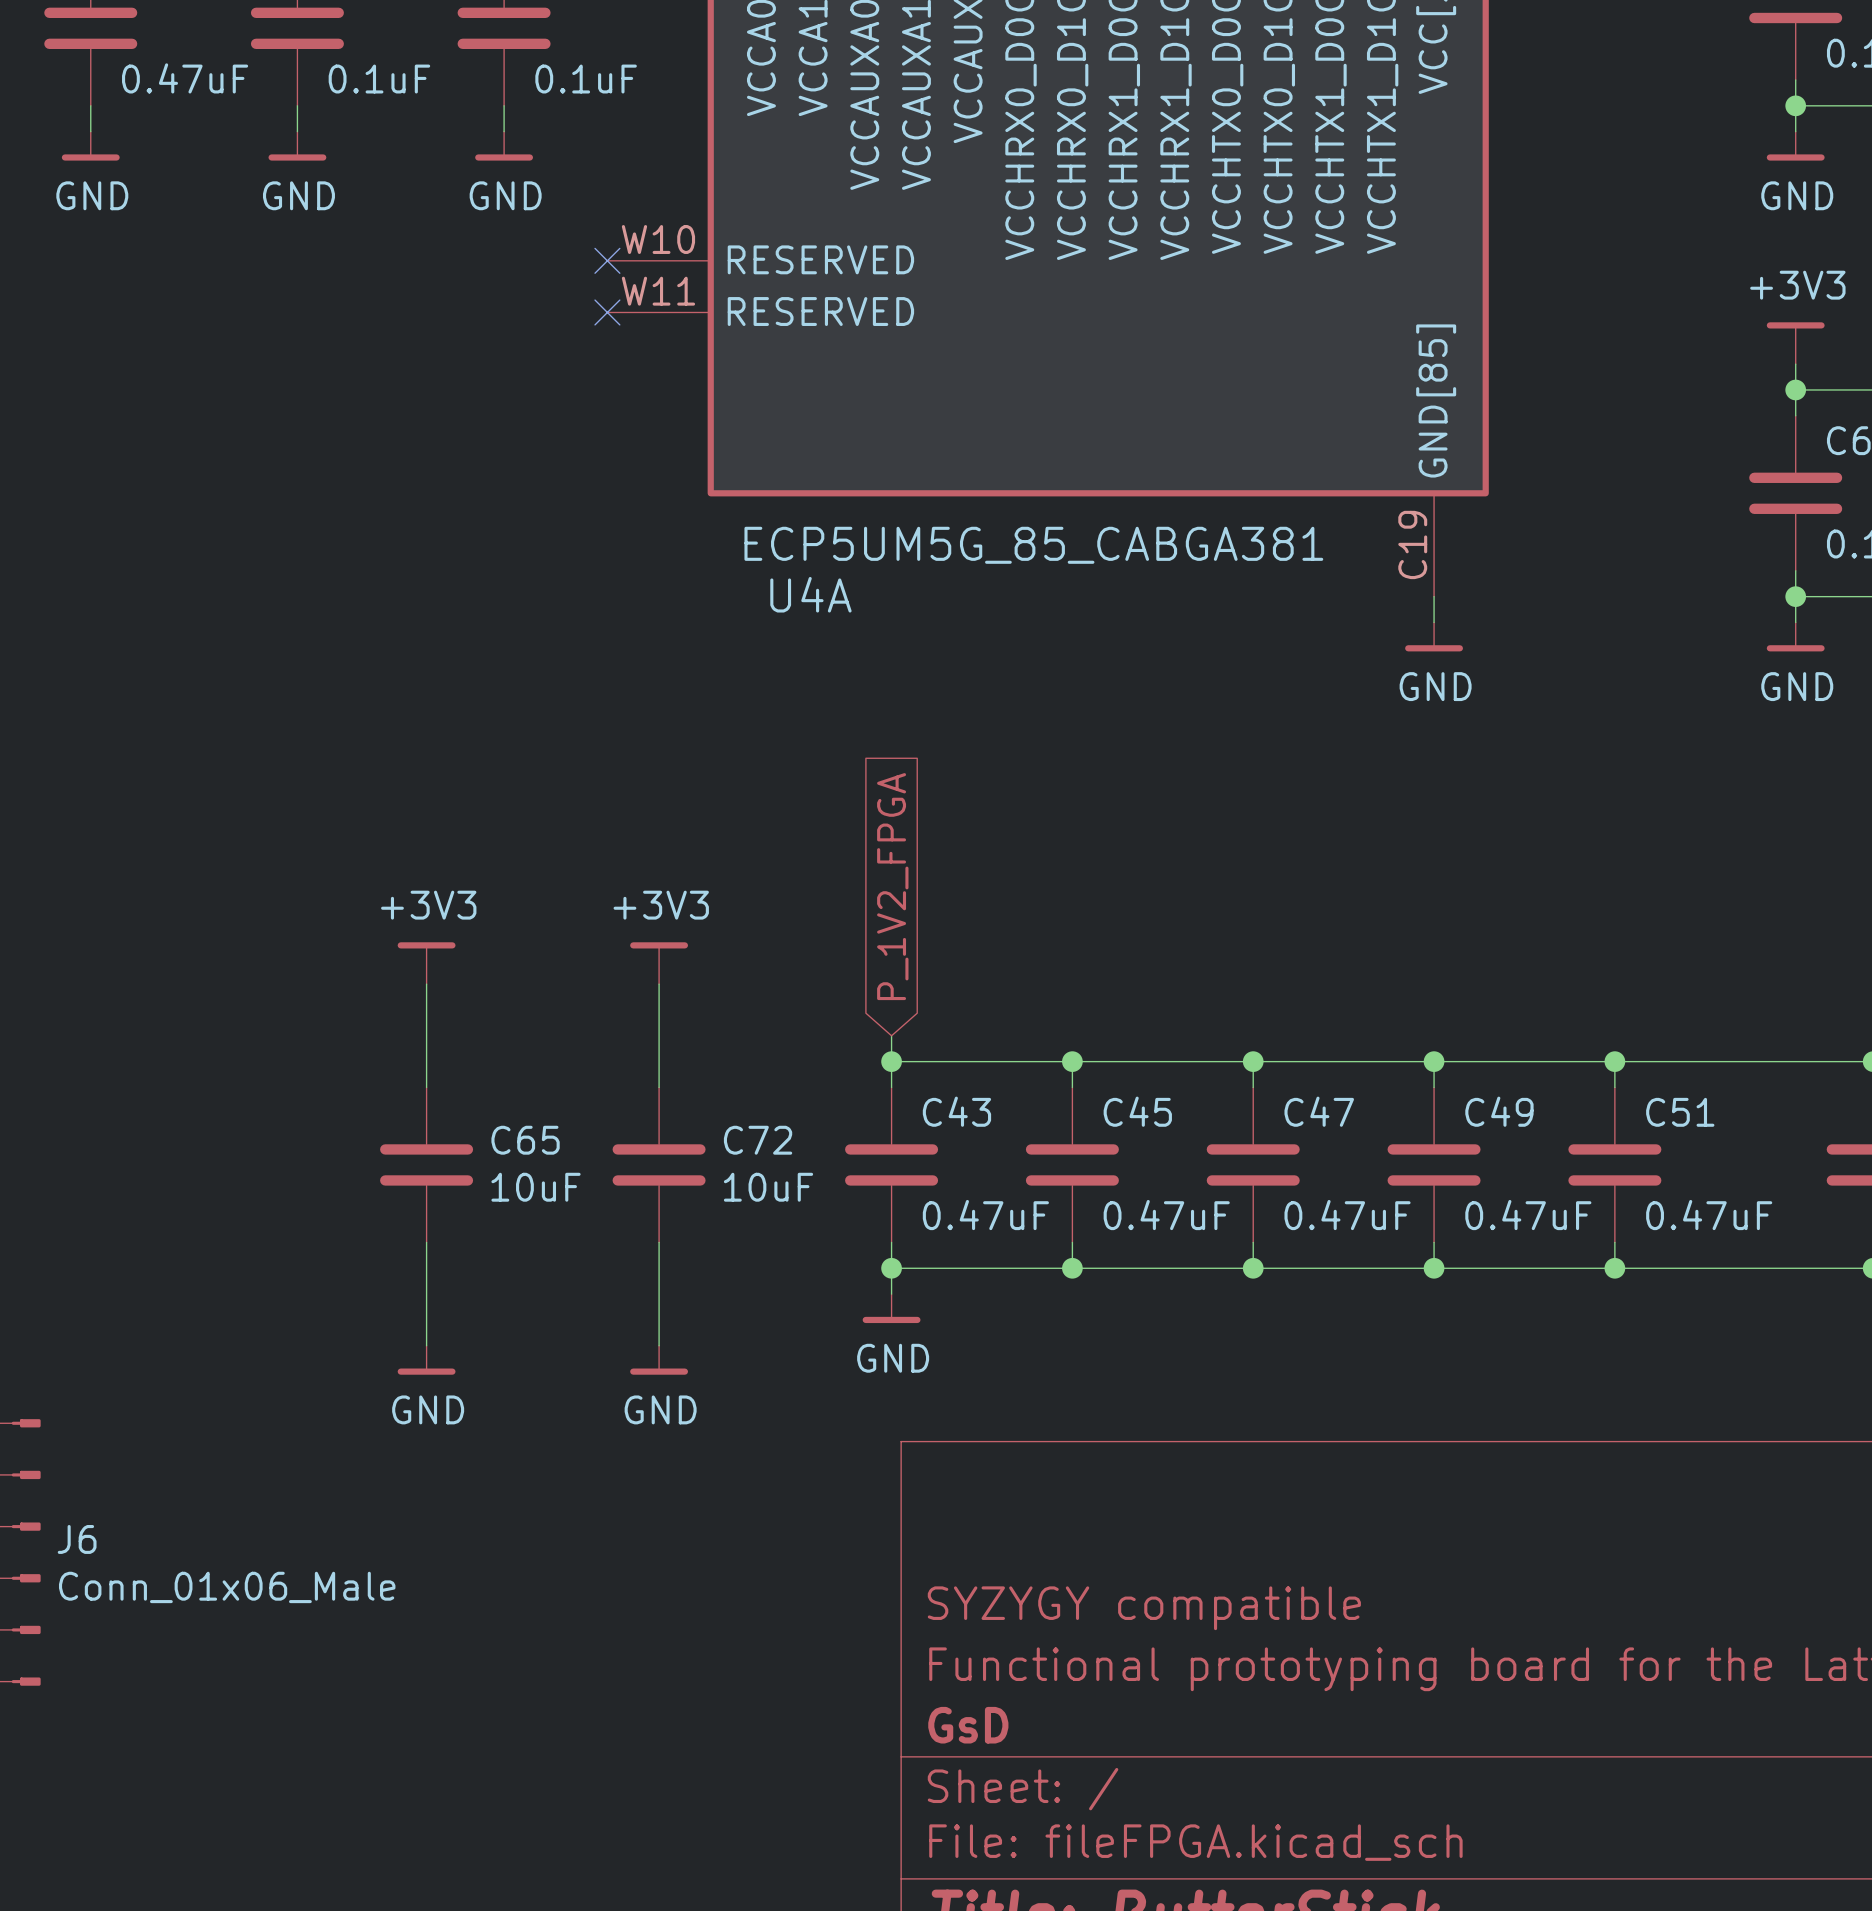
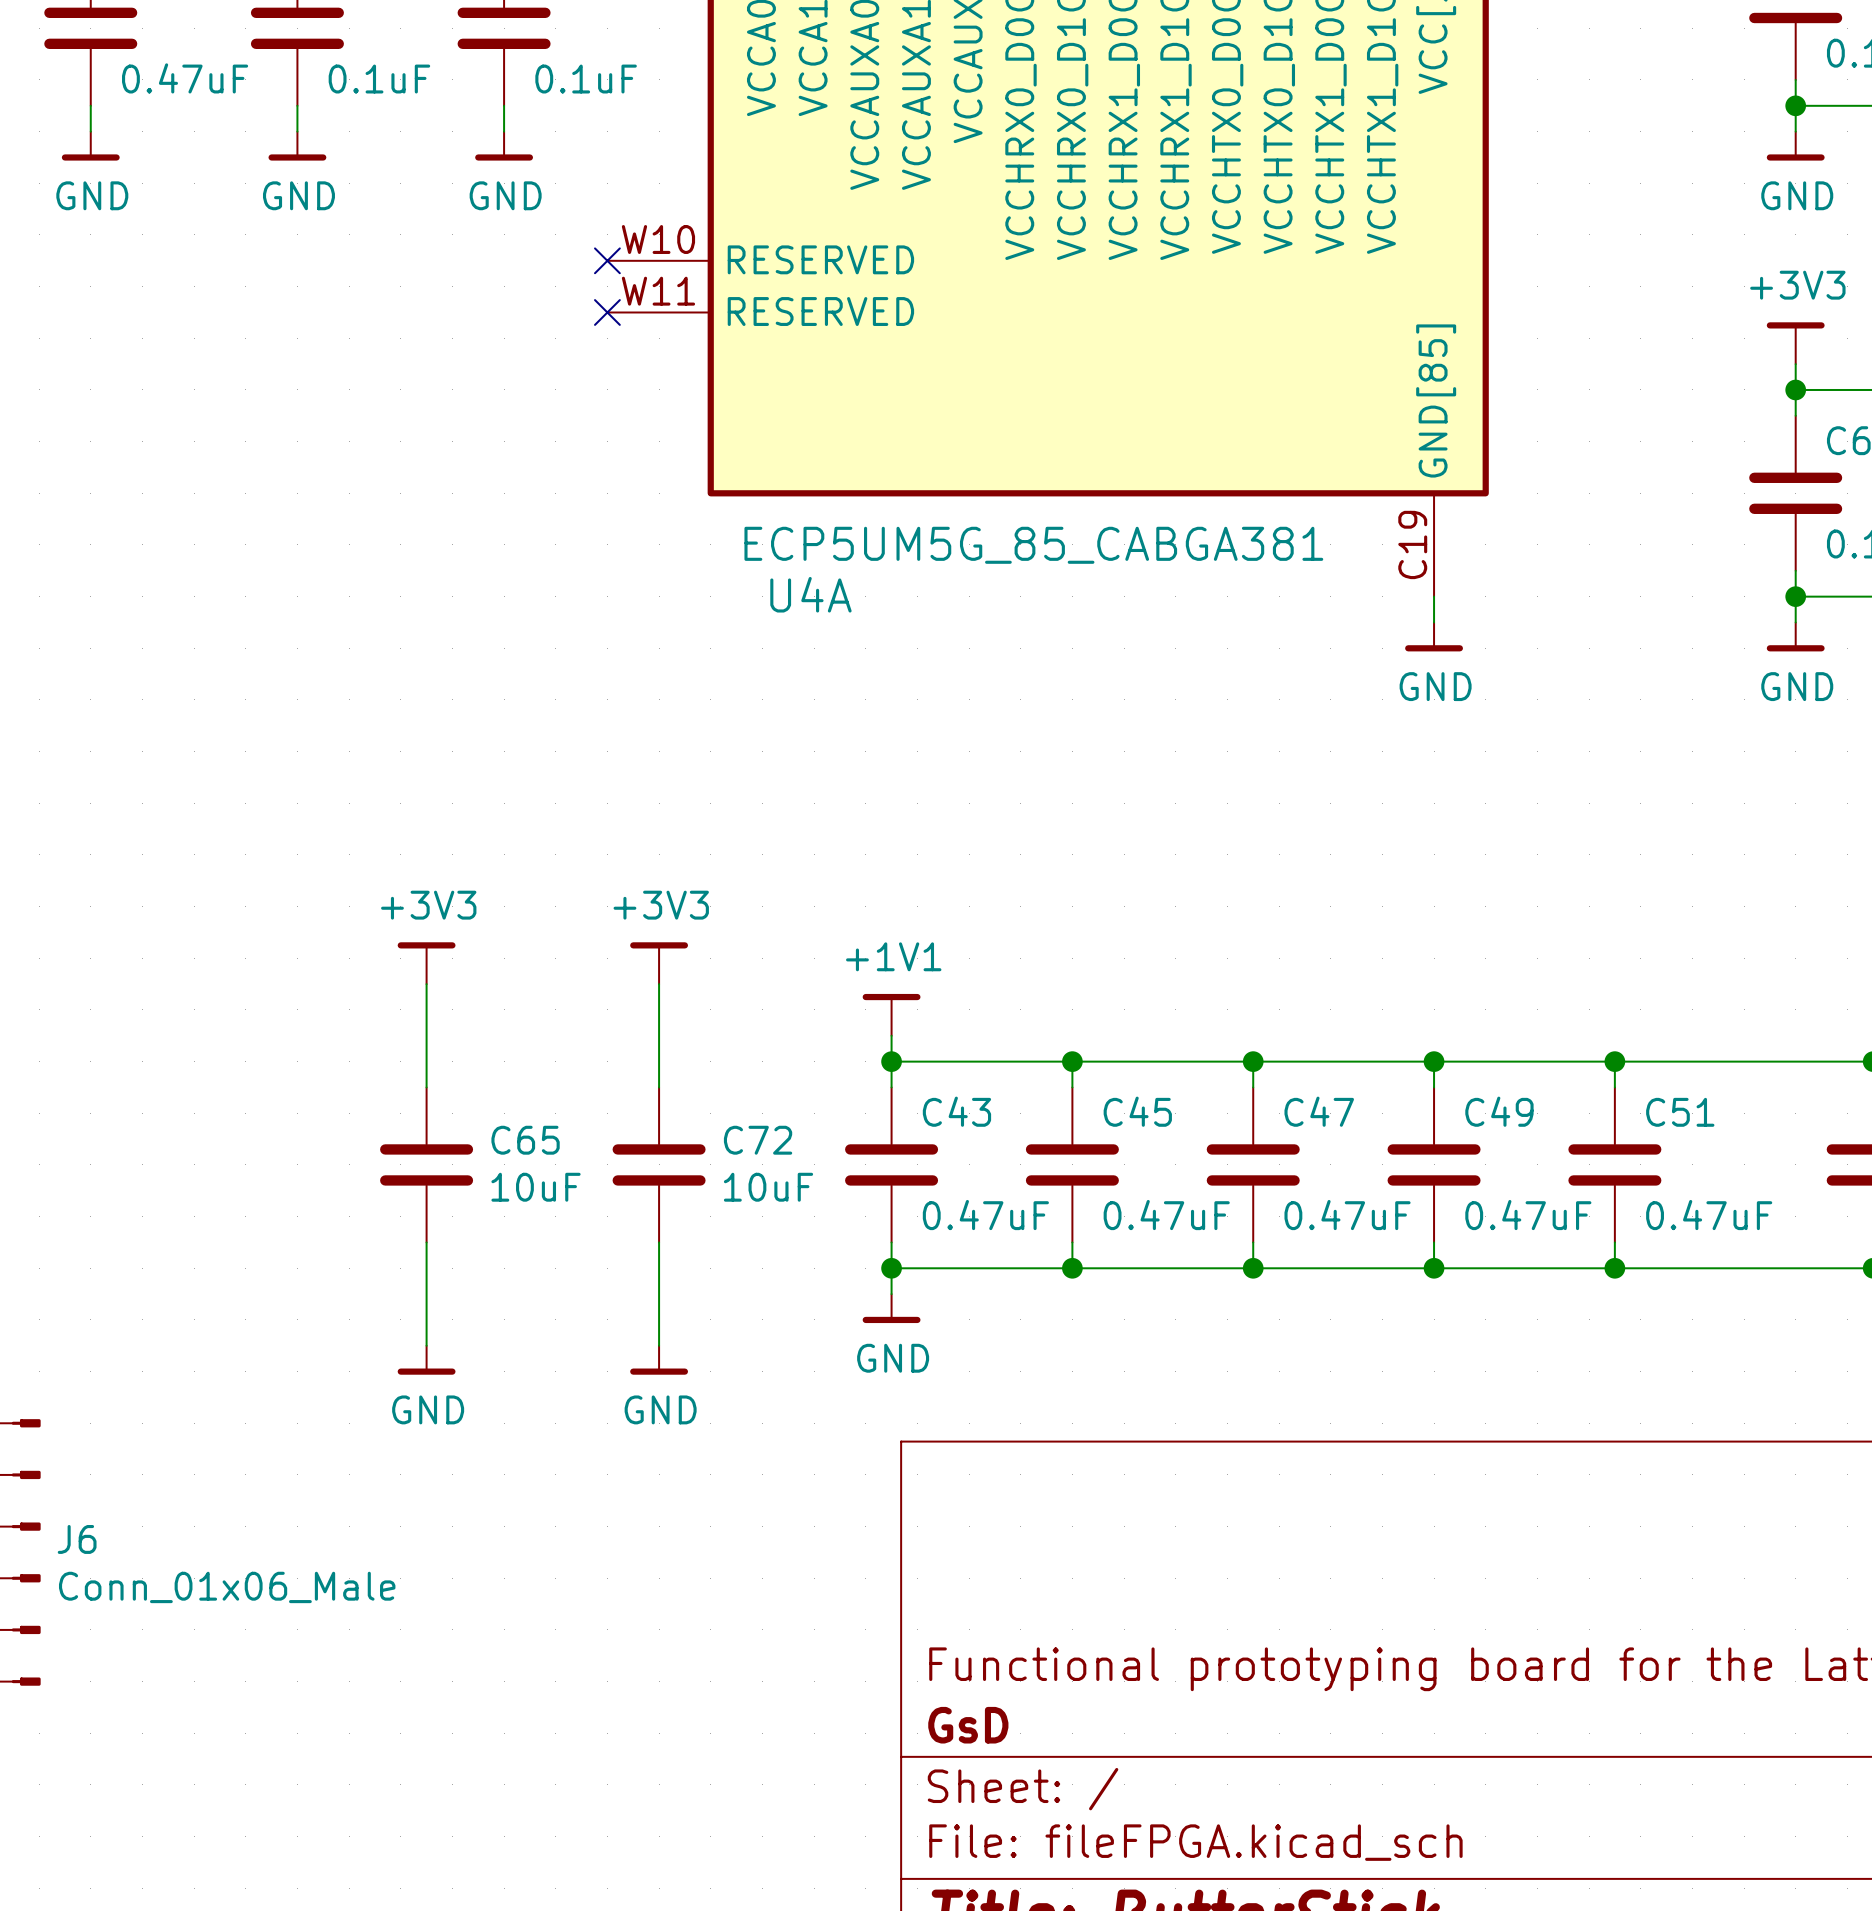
global label: P_1V2_FPGA (892, 886) -> none
power symbol: none -> +1V1 (891, 1014)
title block: SYZYGY compatible (1144, 1608) -> none

